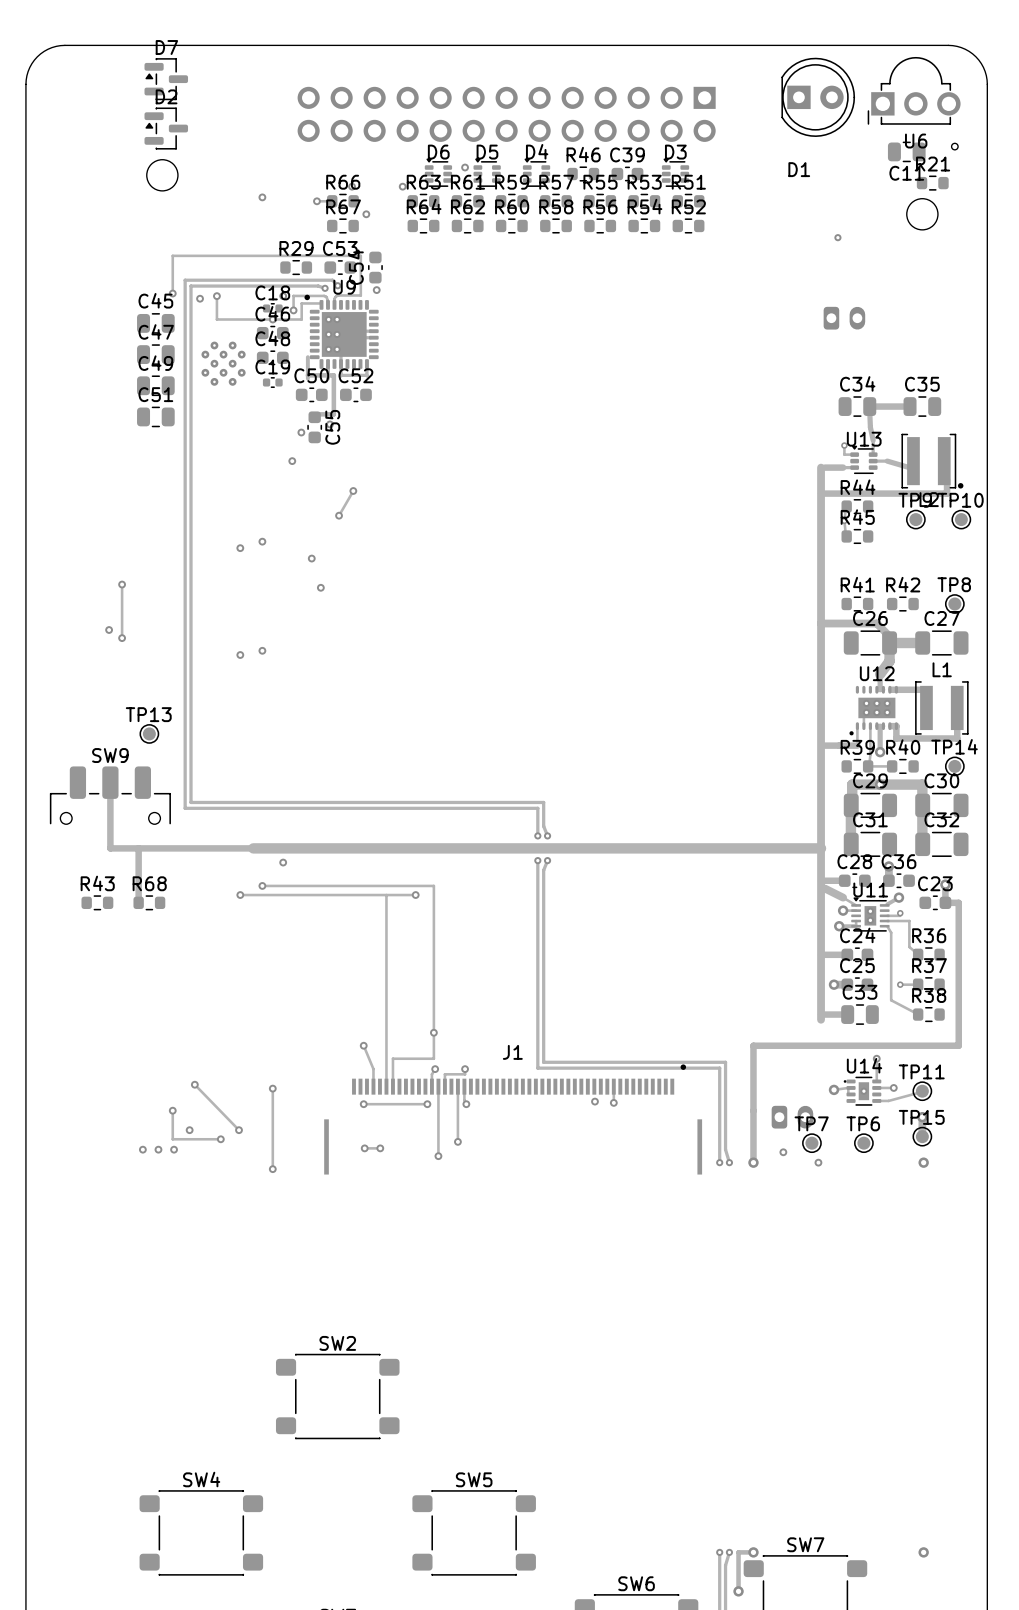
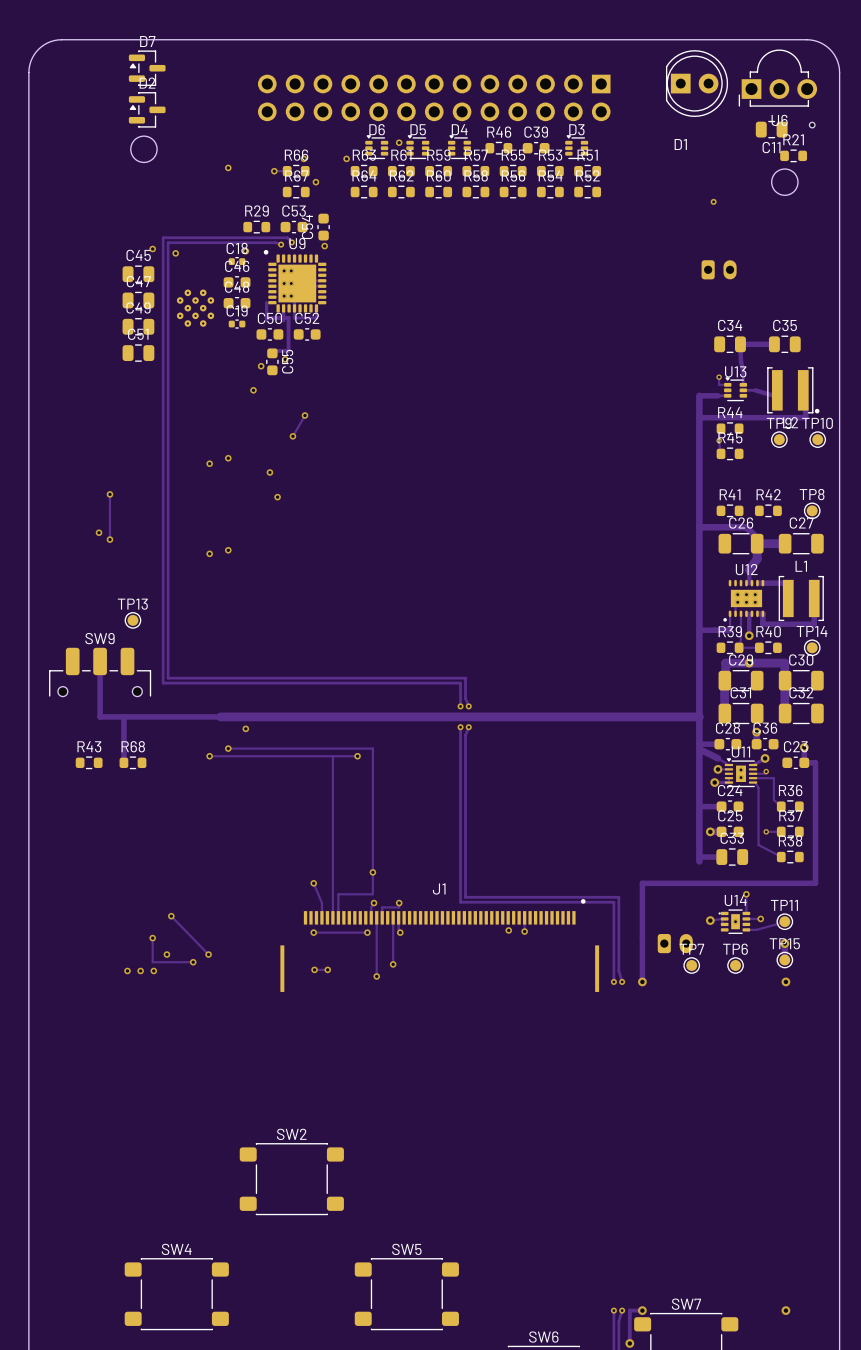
track: (172, 293) (172, 255) (360, 255) (360, 295) (336, 296) (334, 305) -> none
track: (216, 296) (216, 319) (301, 319) (301, 303) (321, 303) (321, 305) -> none
via: (216, 296) -> none
track: (327, 305) (326, 297) (324, 295) (293, 295) (293, 310) -> none
via: (293, 310) -> none
via: (272, 319) -> none
track: (272, 1088) (272, 1169) -> none
via: (272, 1088) -> none
via: (783, 1152) -> none
via: (818, 1162) -> none
via: (272, 1169) -> none

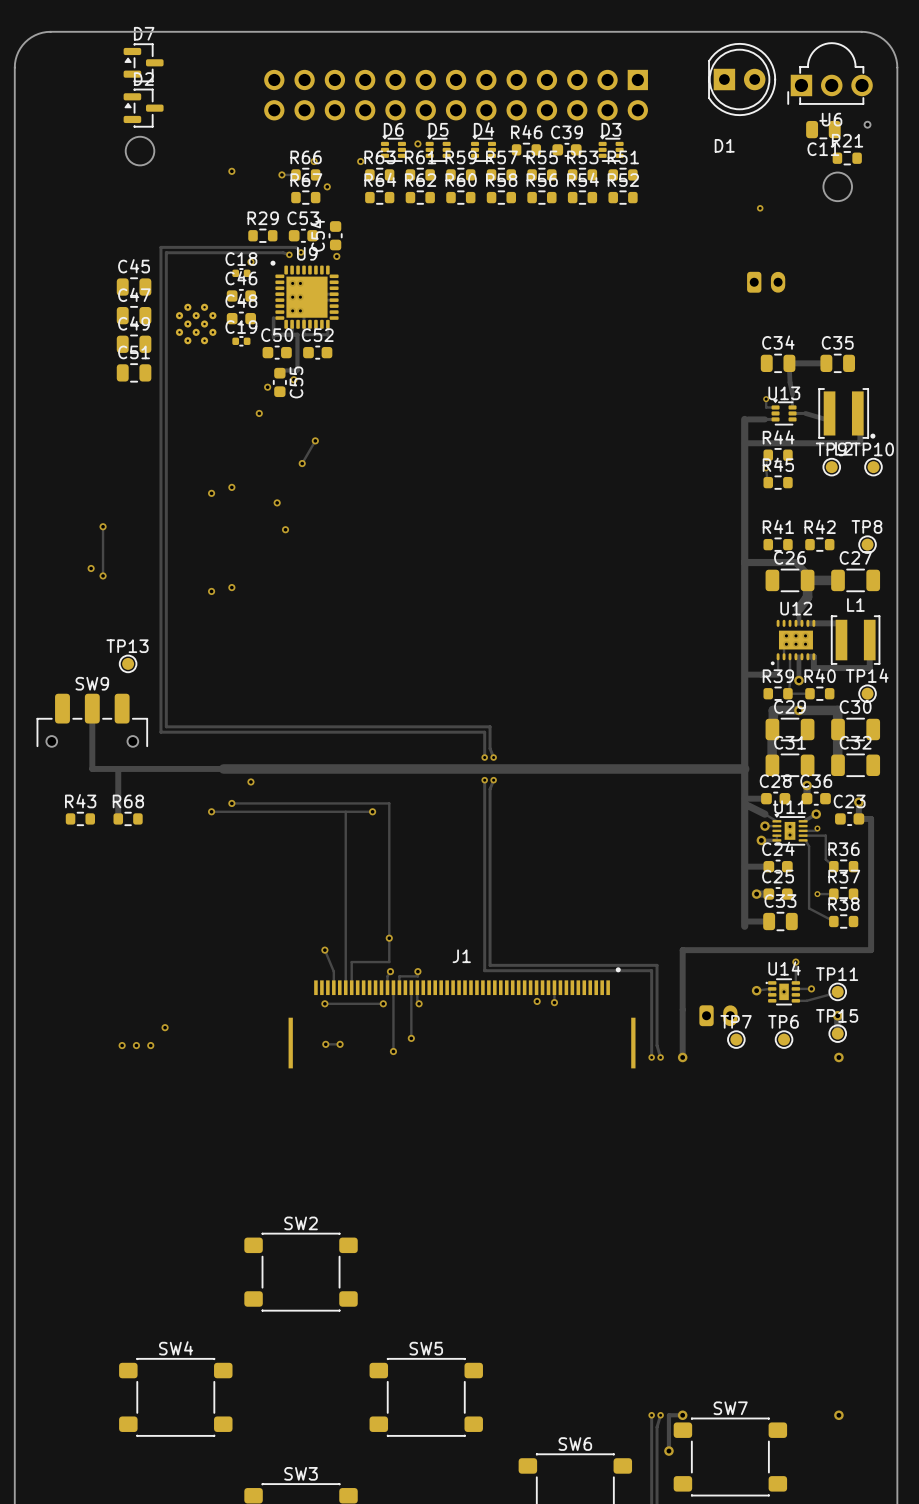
via: (152, 248) -> none
via: (175, 253) -> none
track: (171, 916) (208, 954) -> none
via: (171, 916) -> none
track: (152, 938) (152, 962) (193, 962) -> none
via: (152, 938) -> none
via: (208, 954) -> none
via: (193, 962) -> none

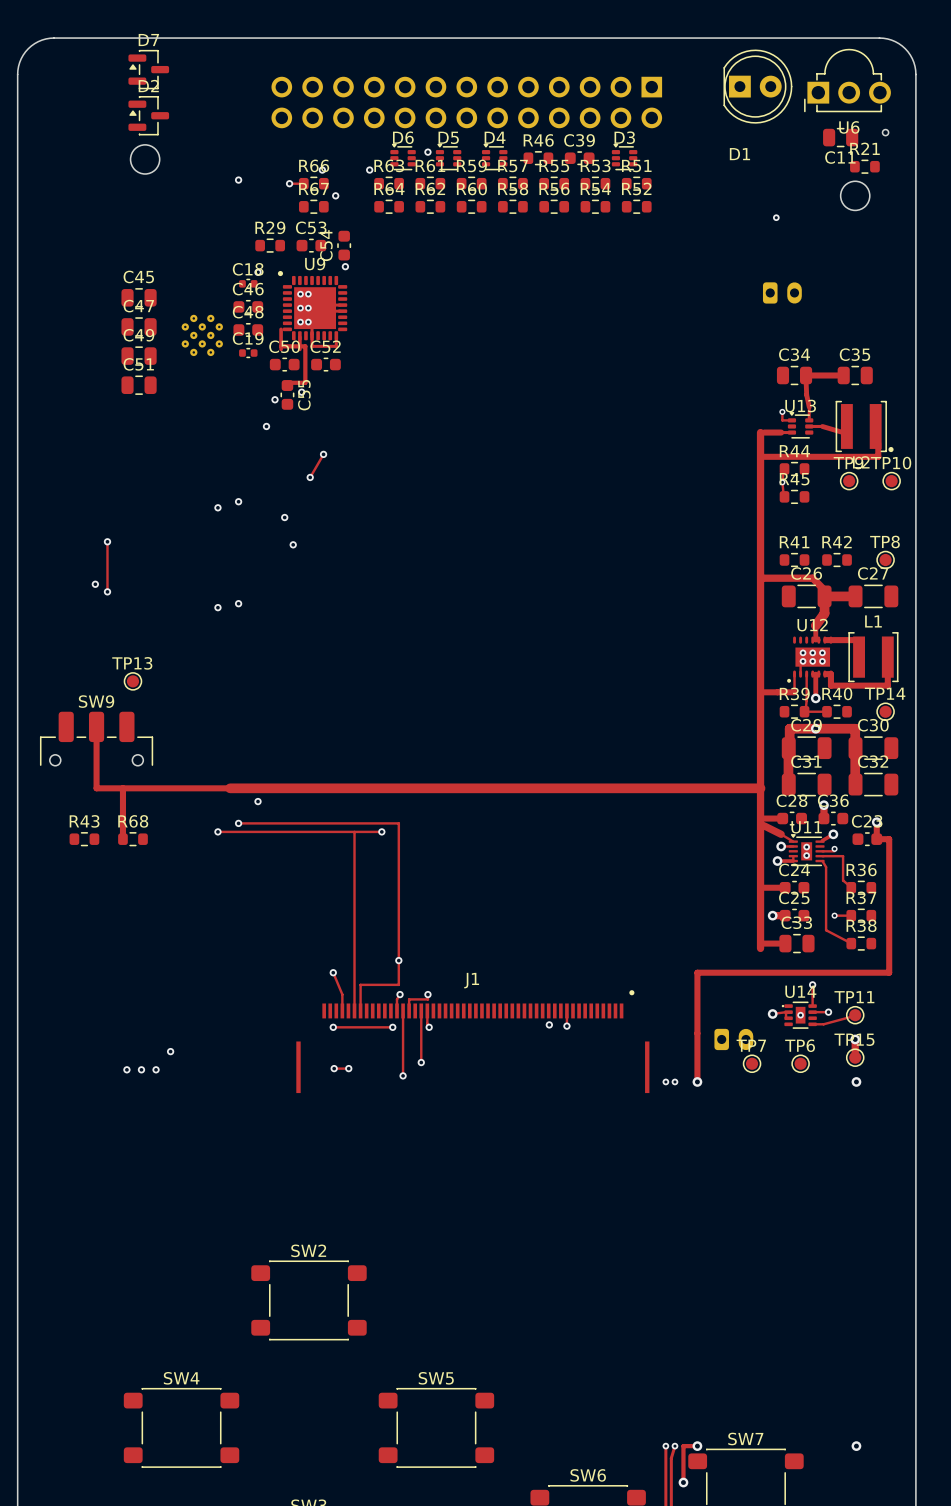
track: (301, 252) (296, 247) (160, 247) (160, 732) (484, 732) (484, 757) -> none
via: (301, 252) -> none
track: (289, 254) (283, 252) (166, 252) (166, 726) (490, 726) (490, 748) (493, 757) -> none
via: (289, 254) -> none
via: (484, 757) -> none
via: (493, 757) -> none
track: (484, 780) (484, 970) (651, 970) (651, 1057) -> none
via: (484, 780) -> none
track: (493, 780) (490, 789) (490, 965) (657, 965) (657, 1045) (660, 1057) -> none
via: (493, 780) -> none

